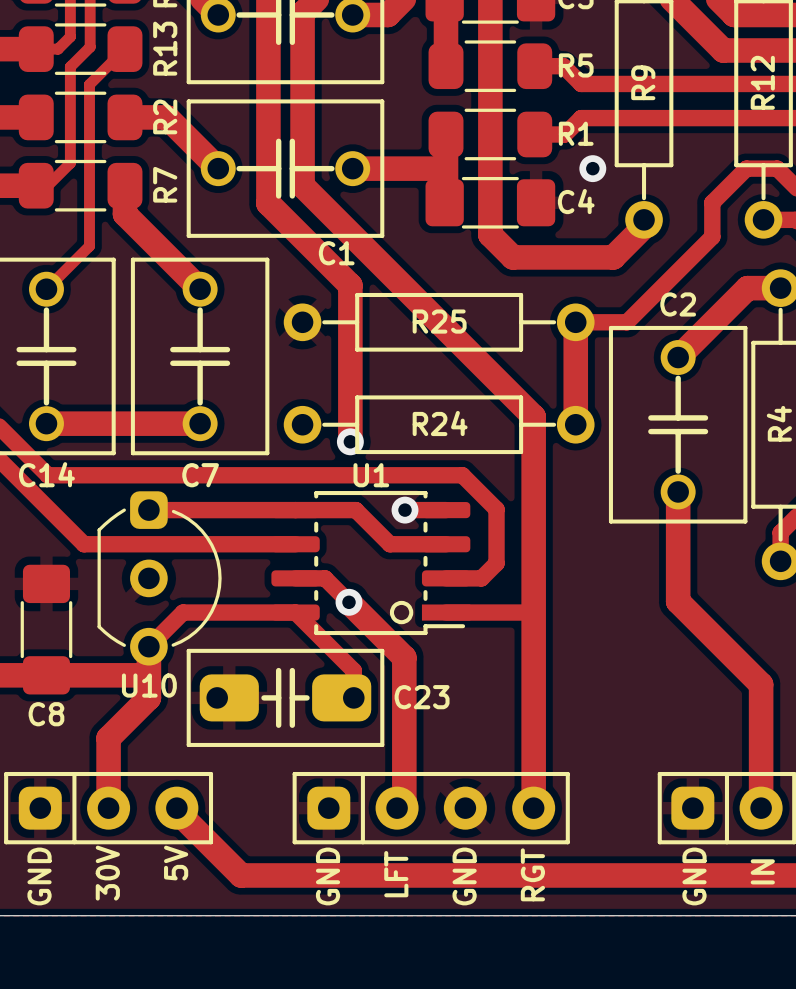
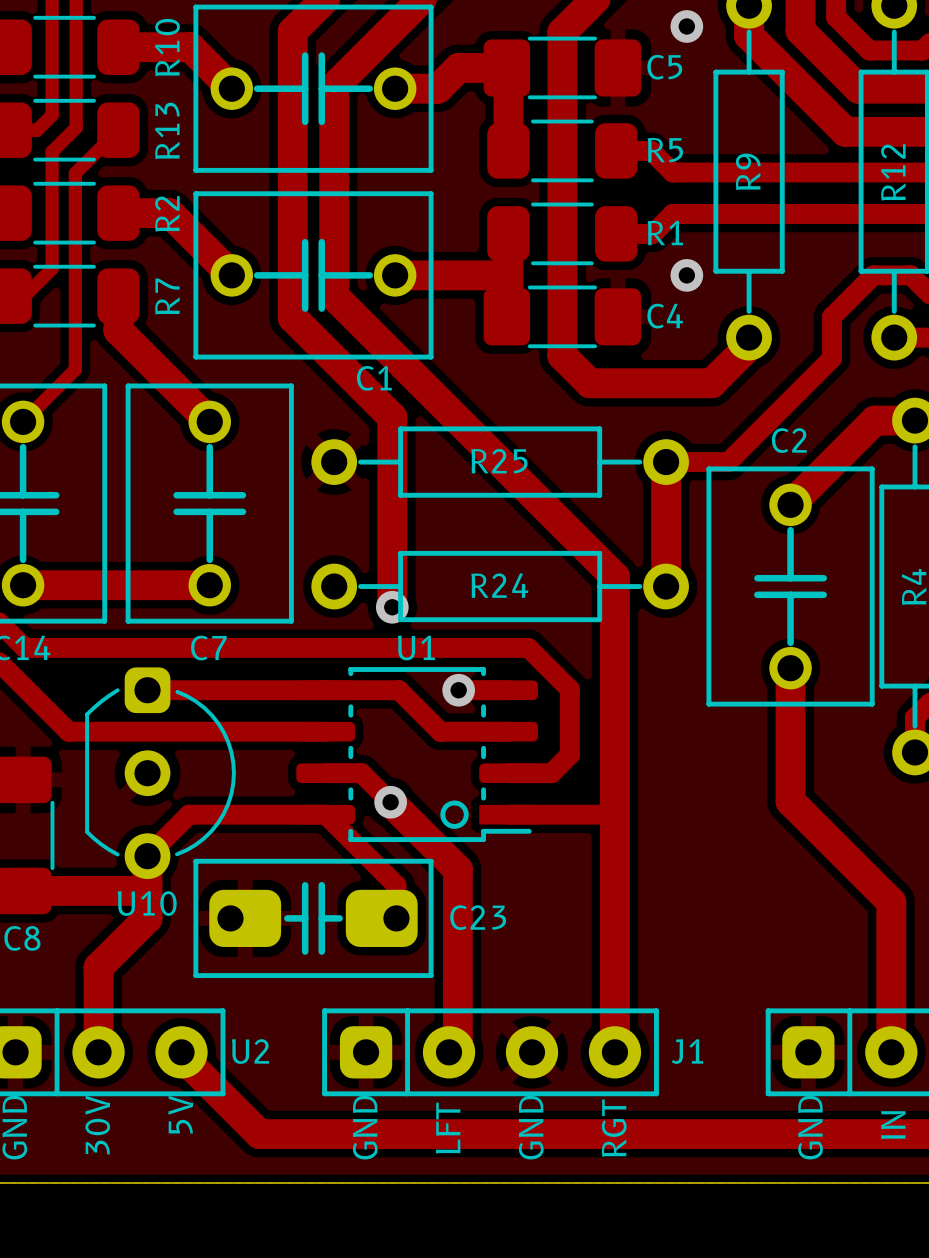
U2 name: none -> U2 (250, 1051)
J1 name: none -> J1 (687, 1051)

